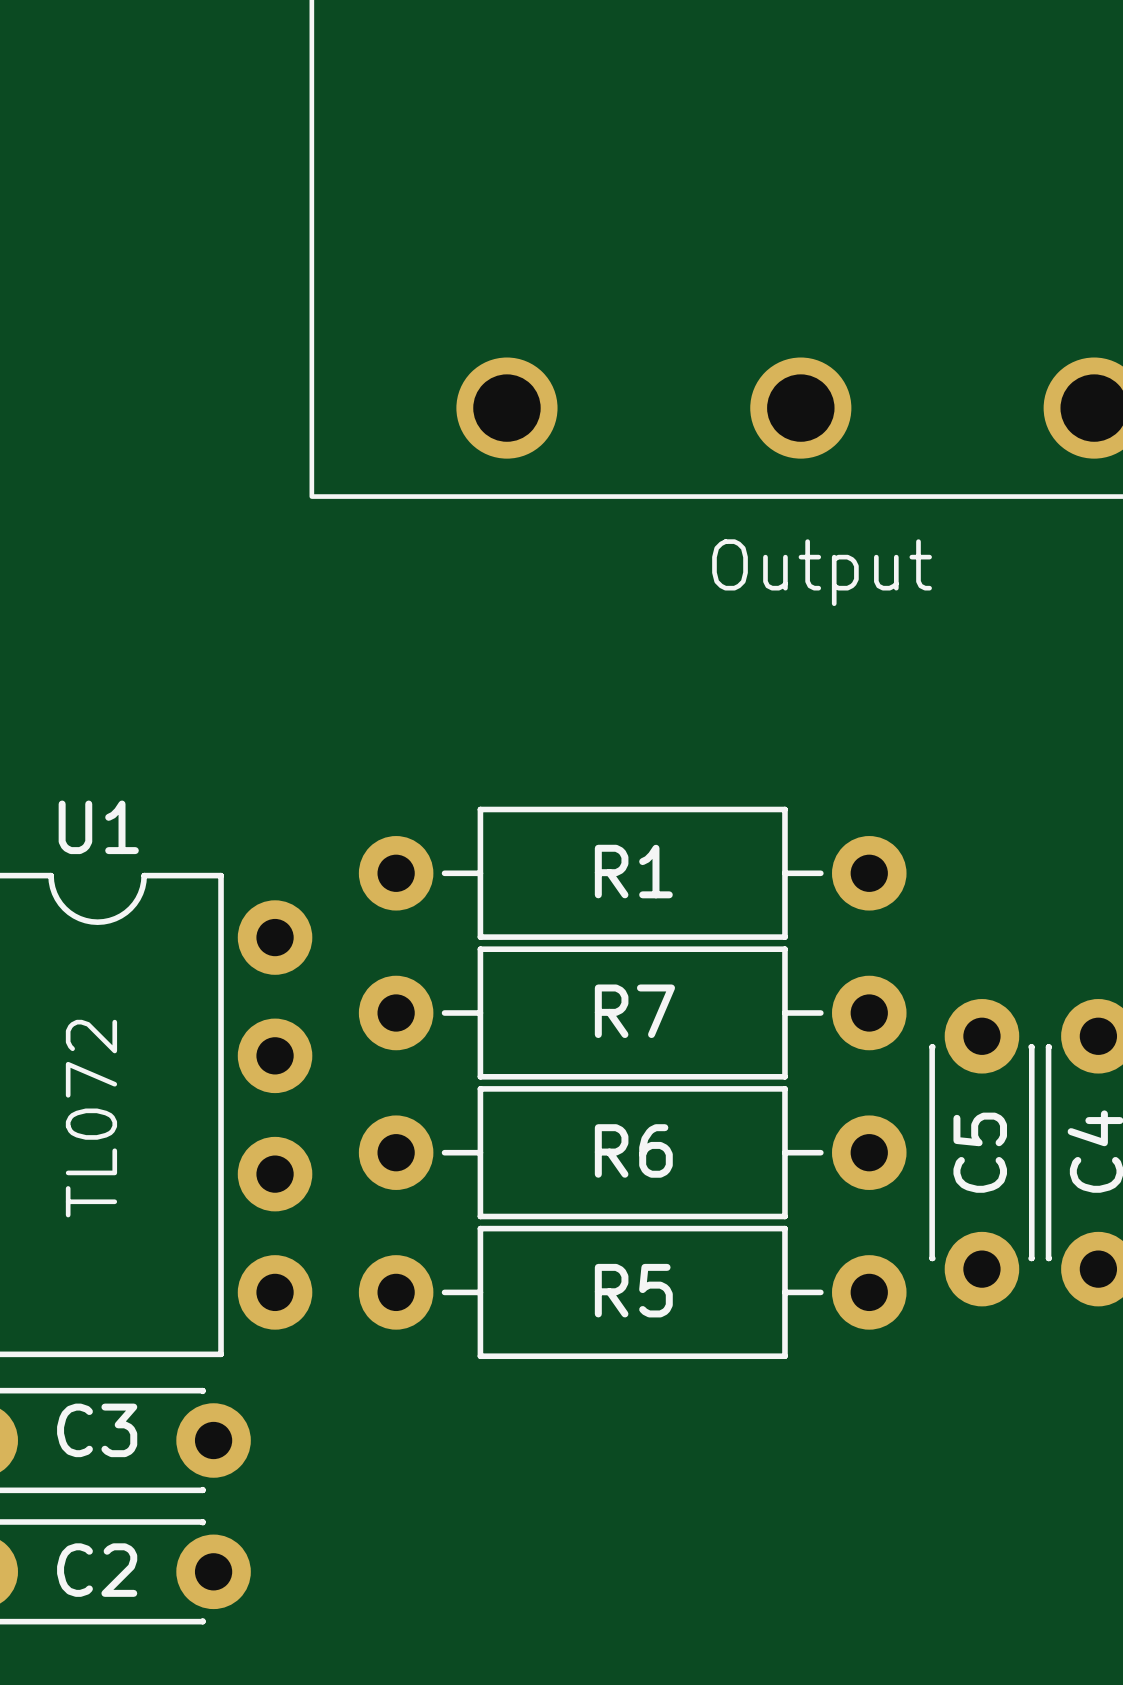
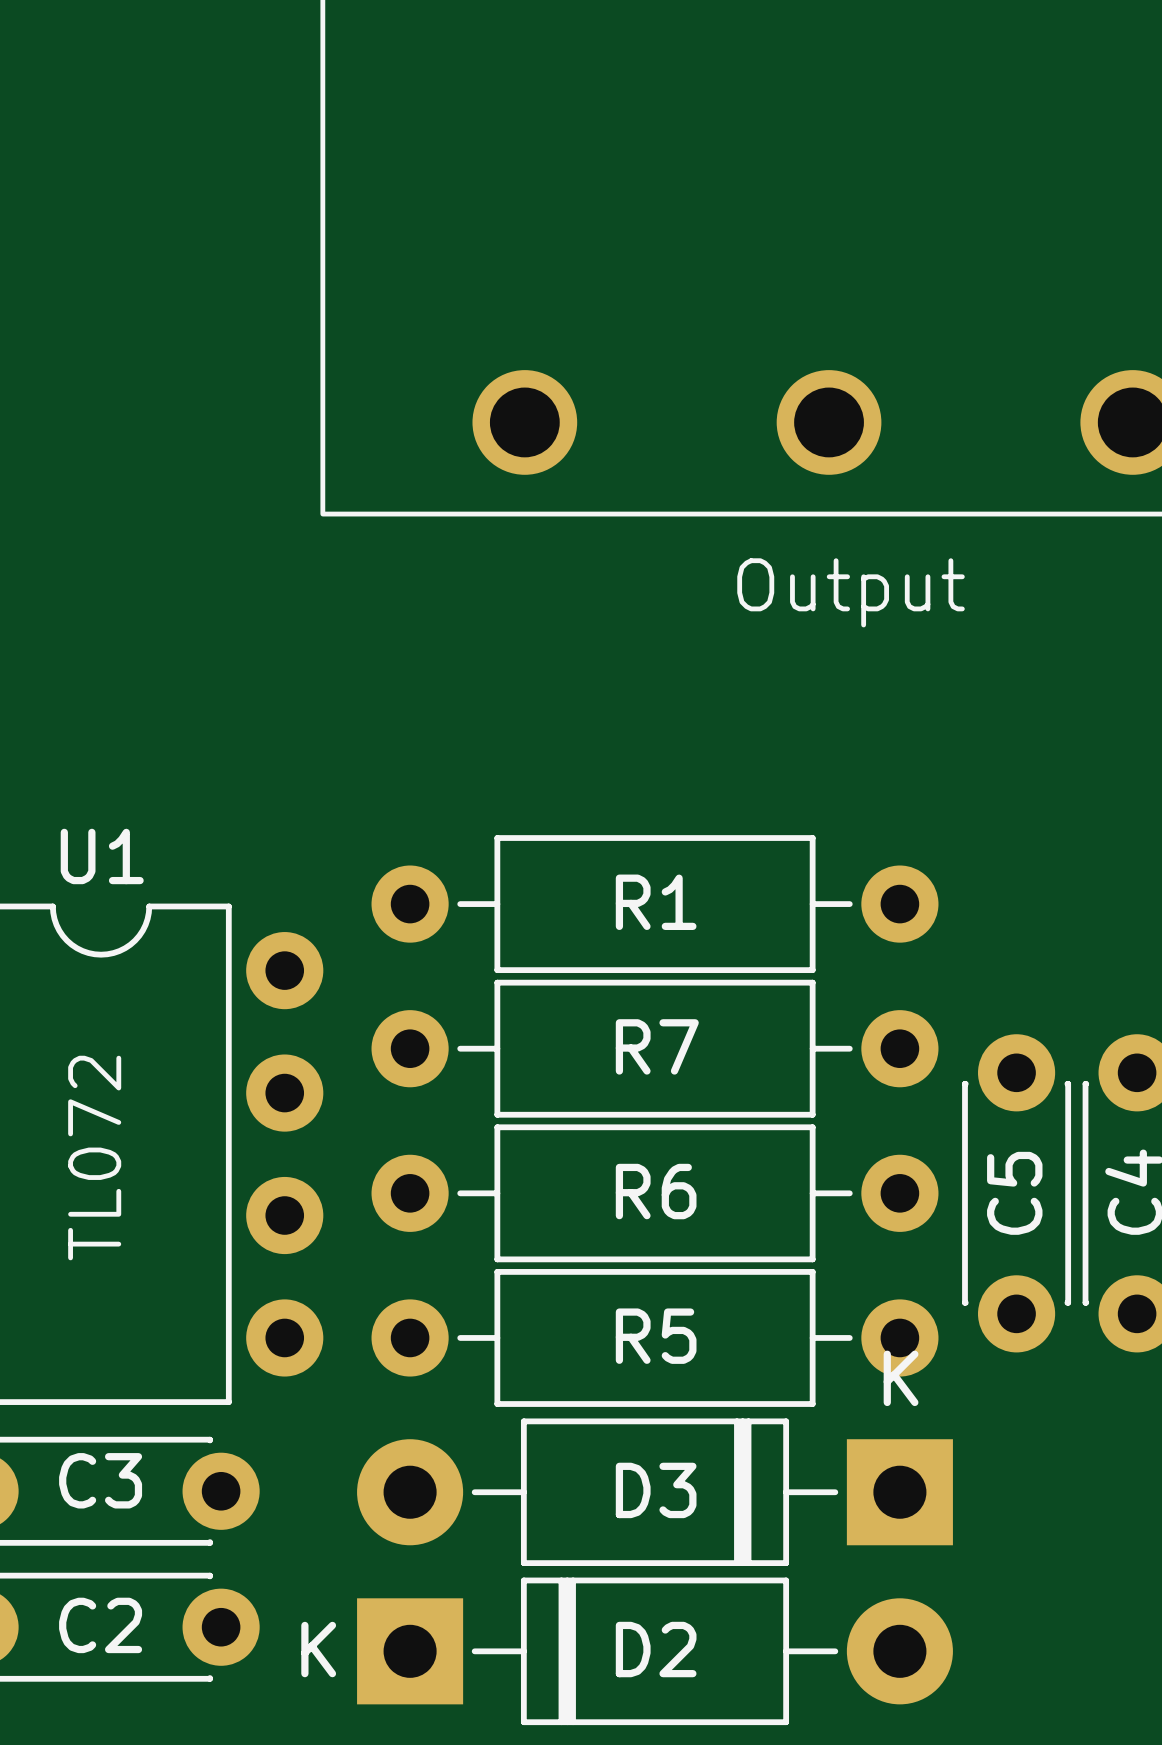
D3: none -> (655, 1492)
D2: none -> (655, 1651)

